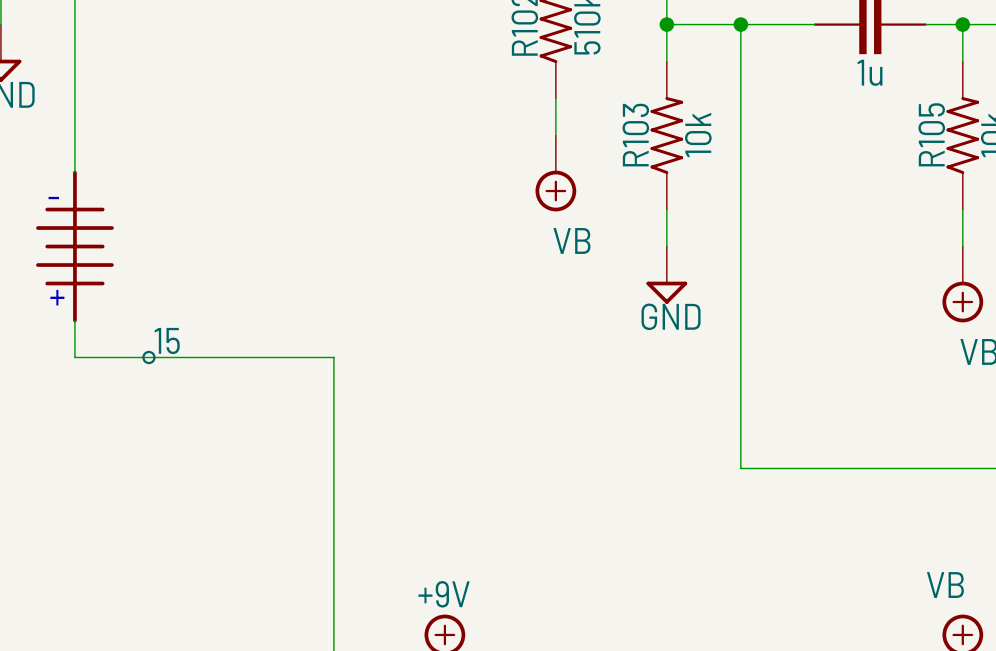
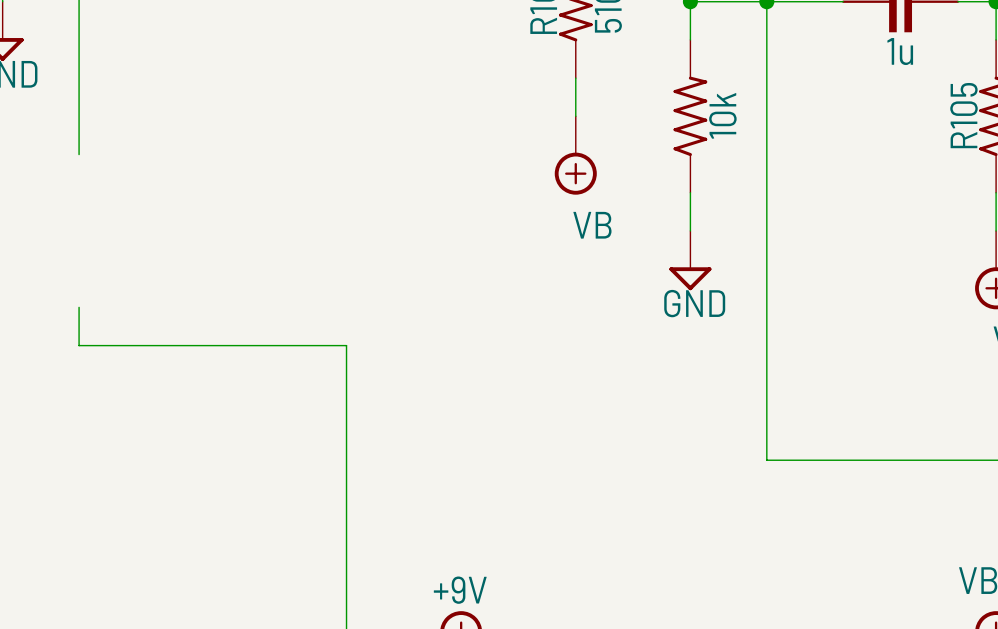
R103 name: R103 (635, 135) -> none
part: (74, 246) -> none
text: 15 (167, 340) -> none
drawing: [142, 350, 156, 365] -> none

